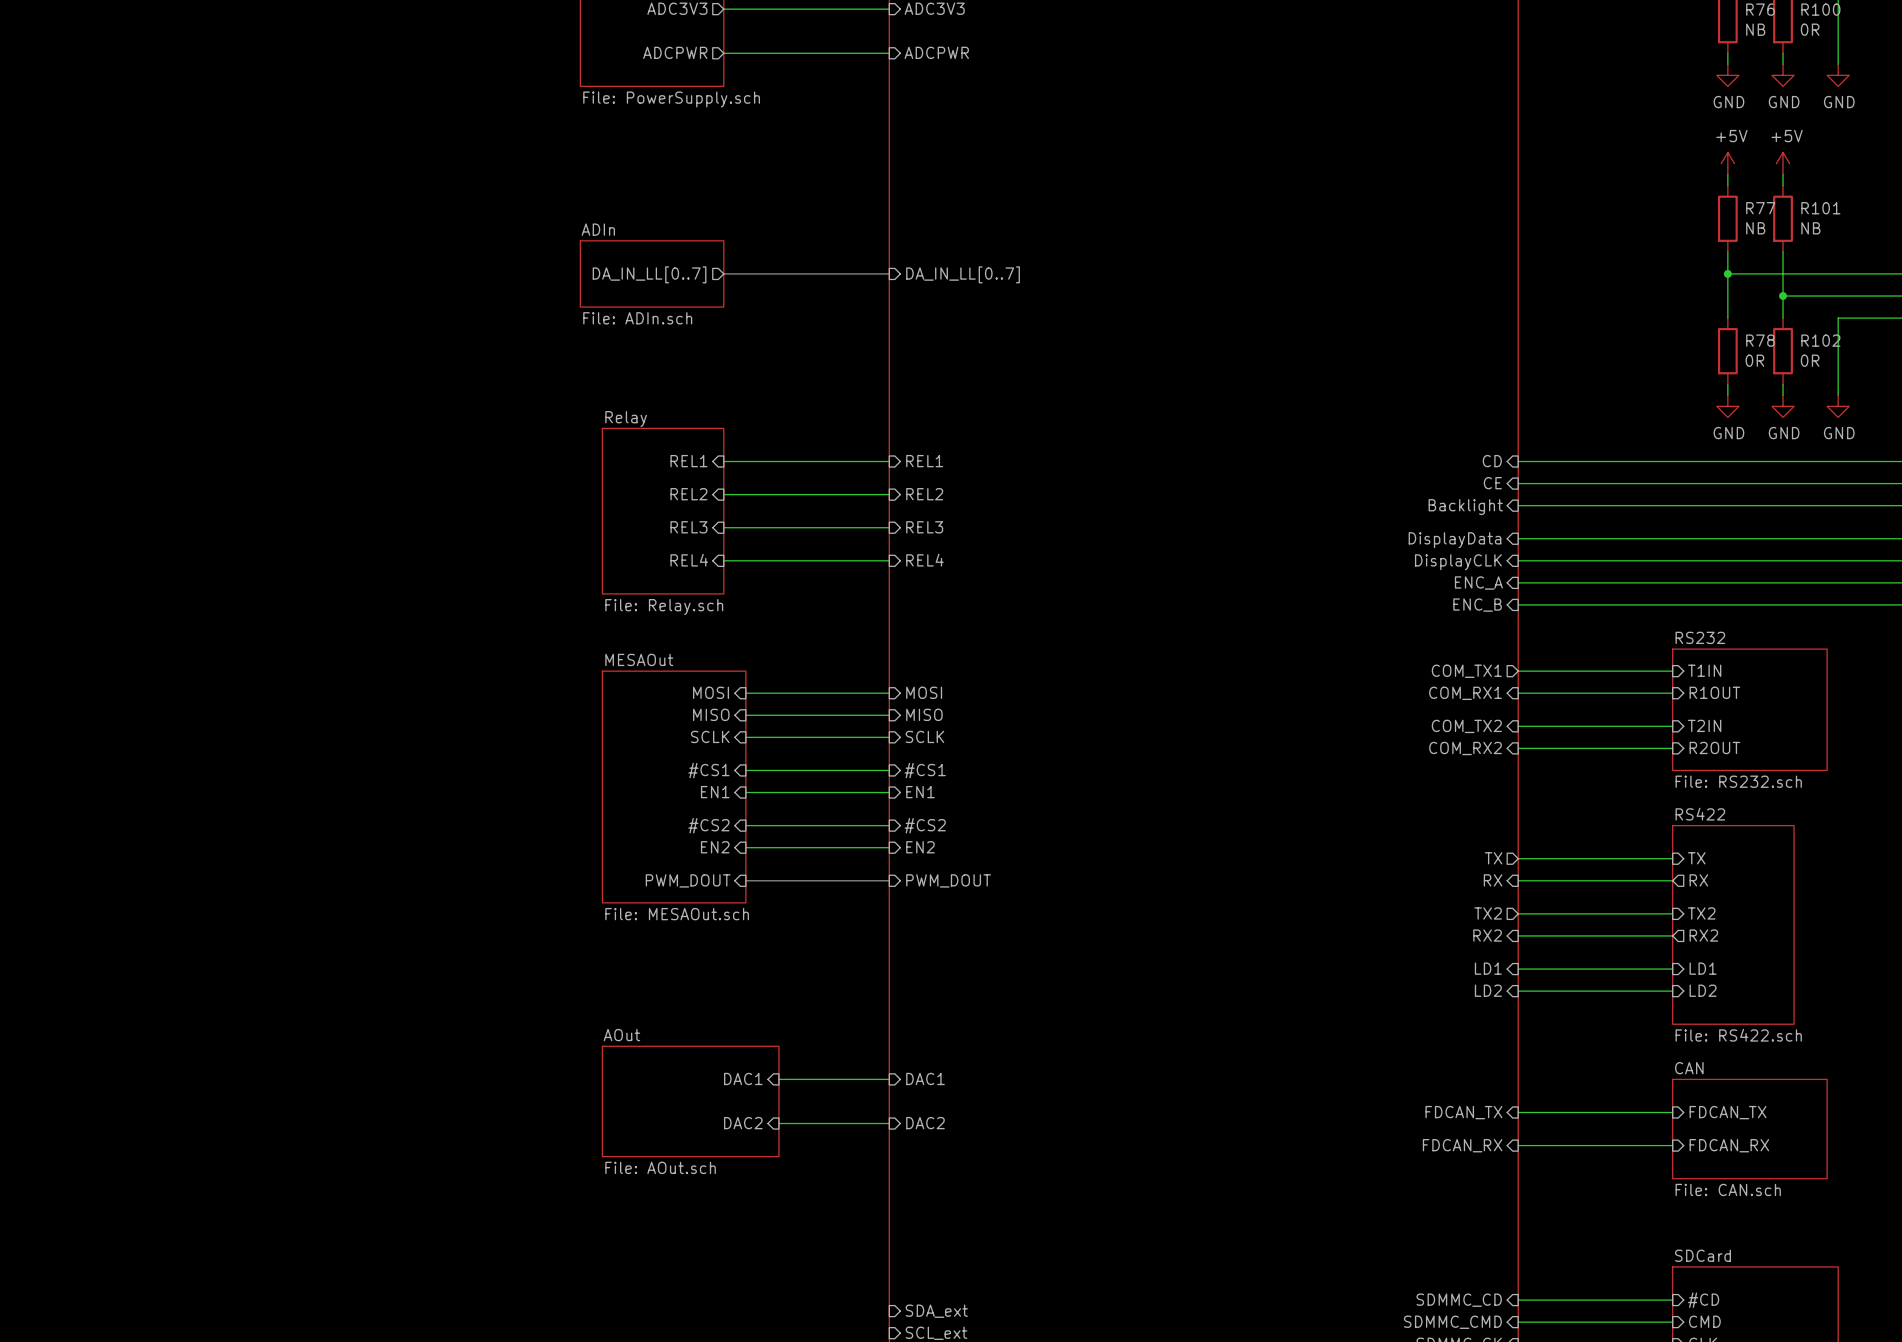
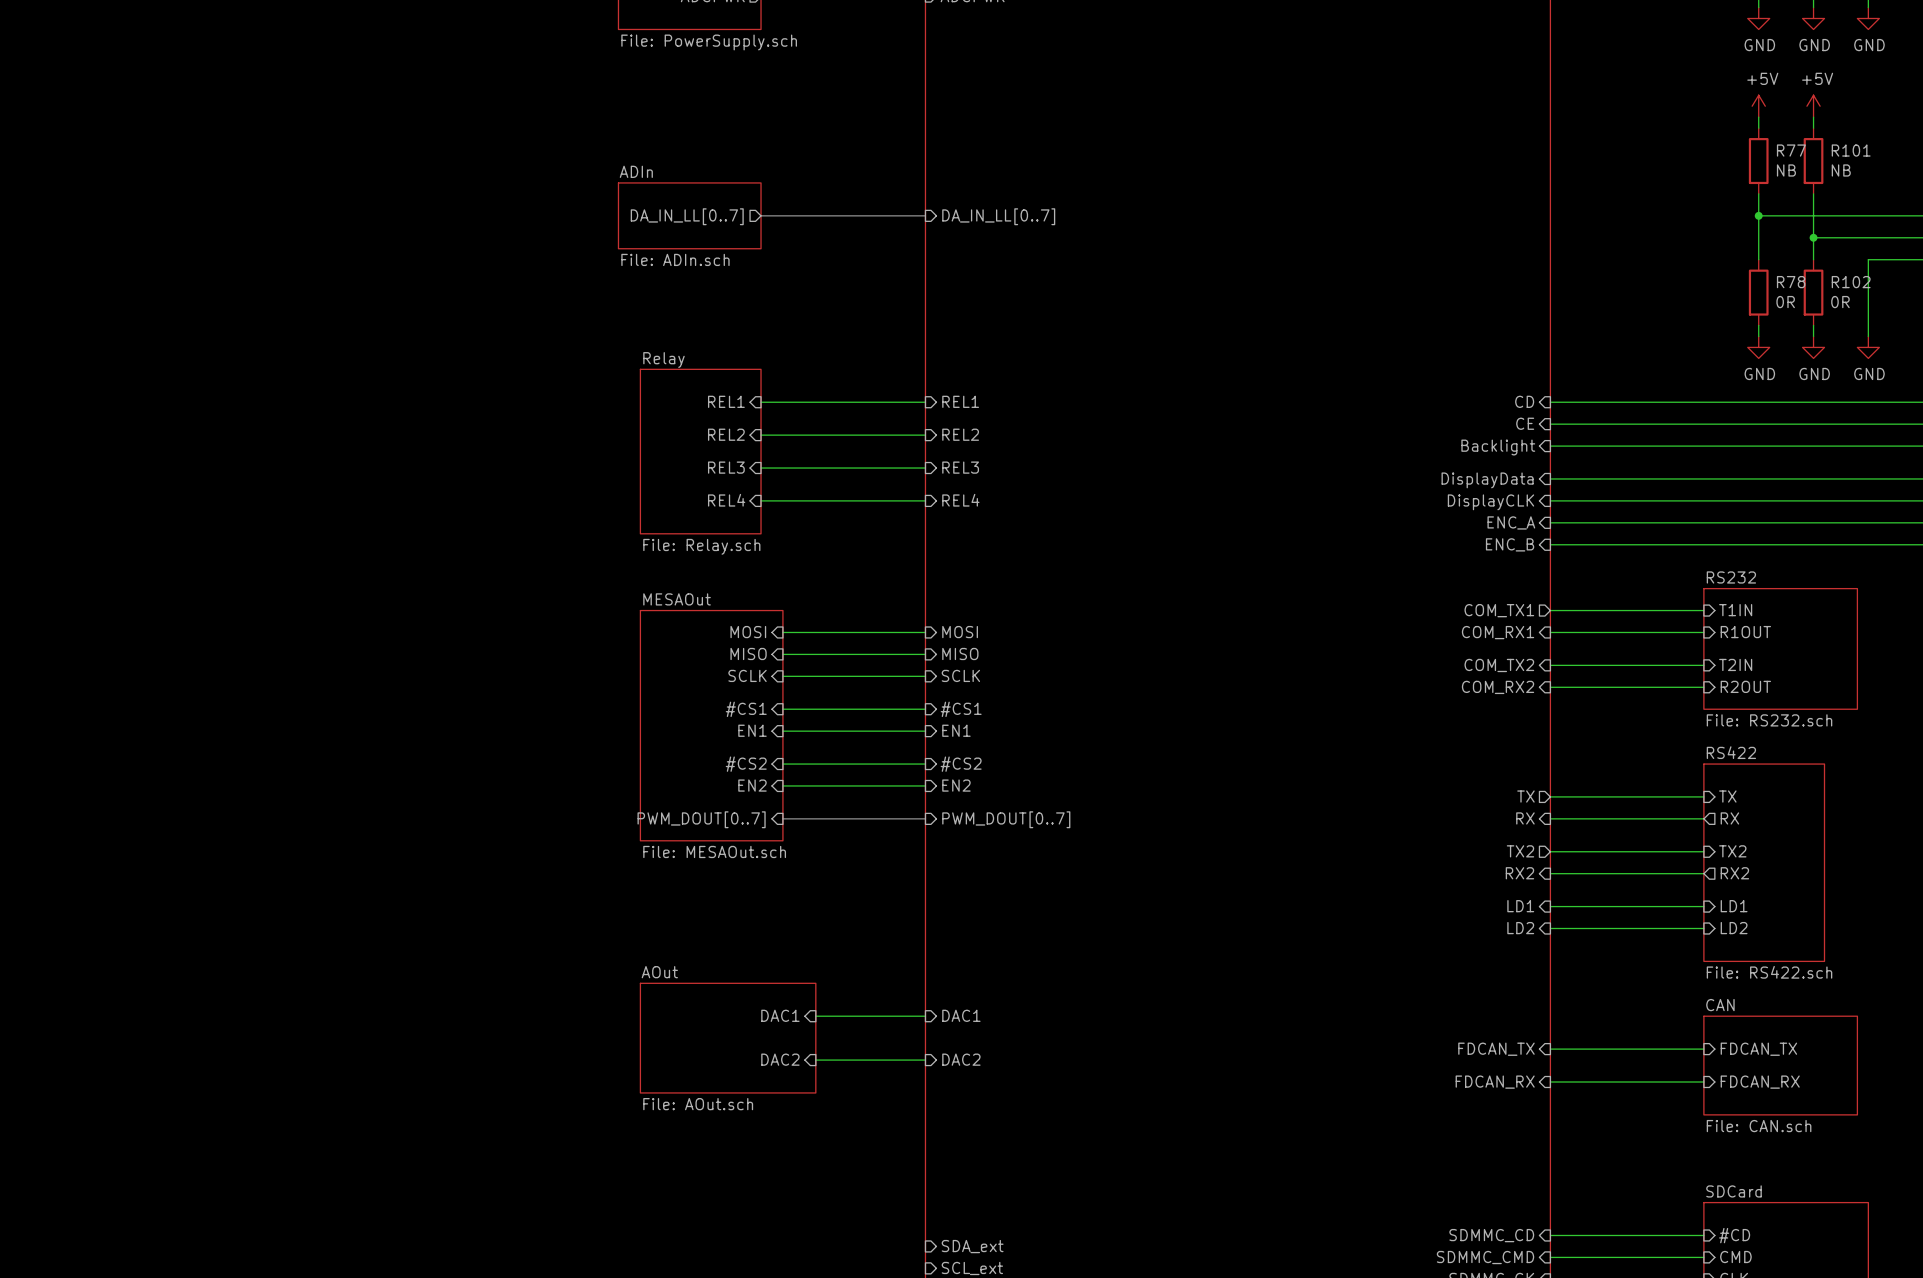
sheet pin: PWM_DOUT (688, 880) -> PWM_DOUT[0..7] (701, 819)
sheet pin: PWM_DOUT (948, 880) -> PWM_DOUT[0..7] (1006, 819)

